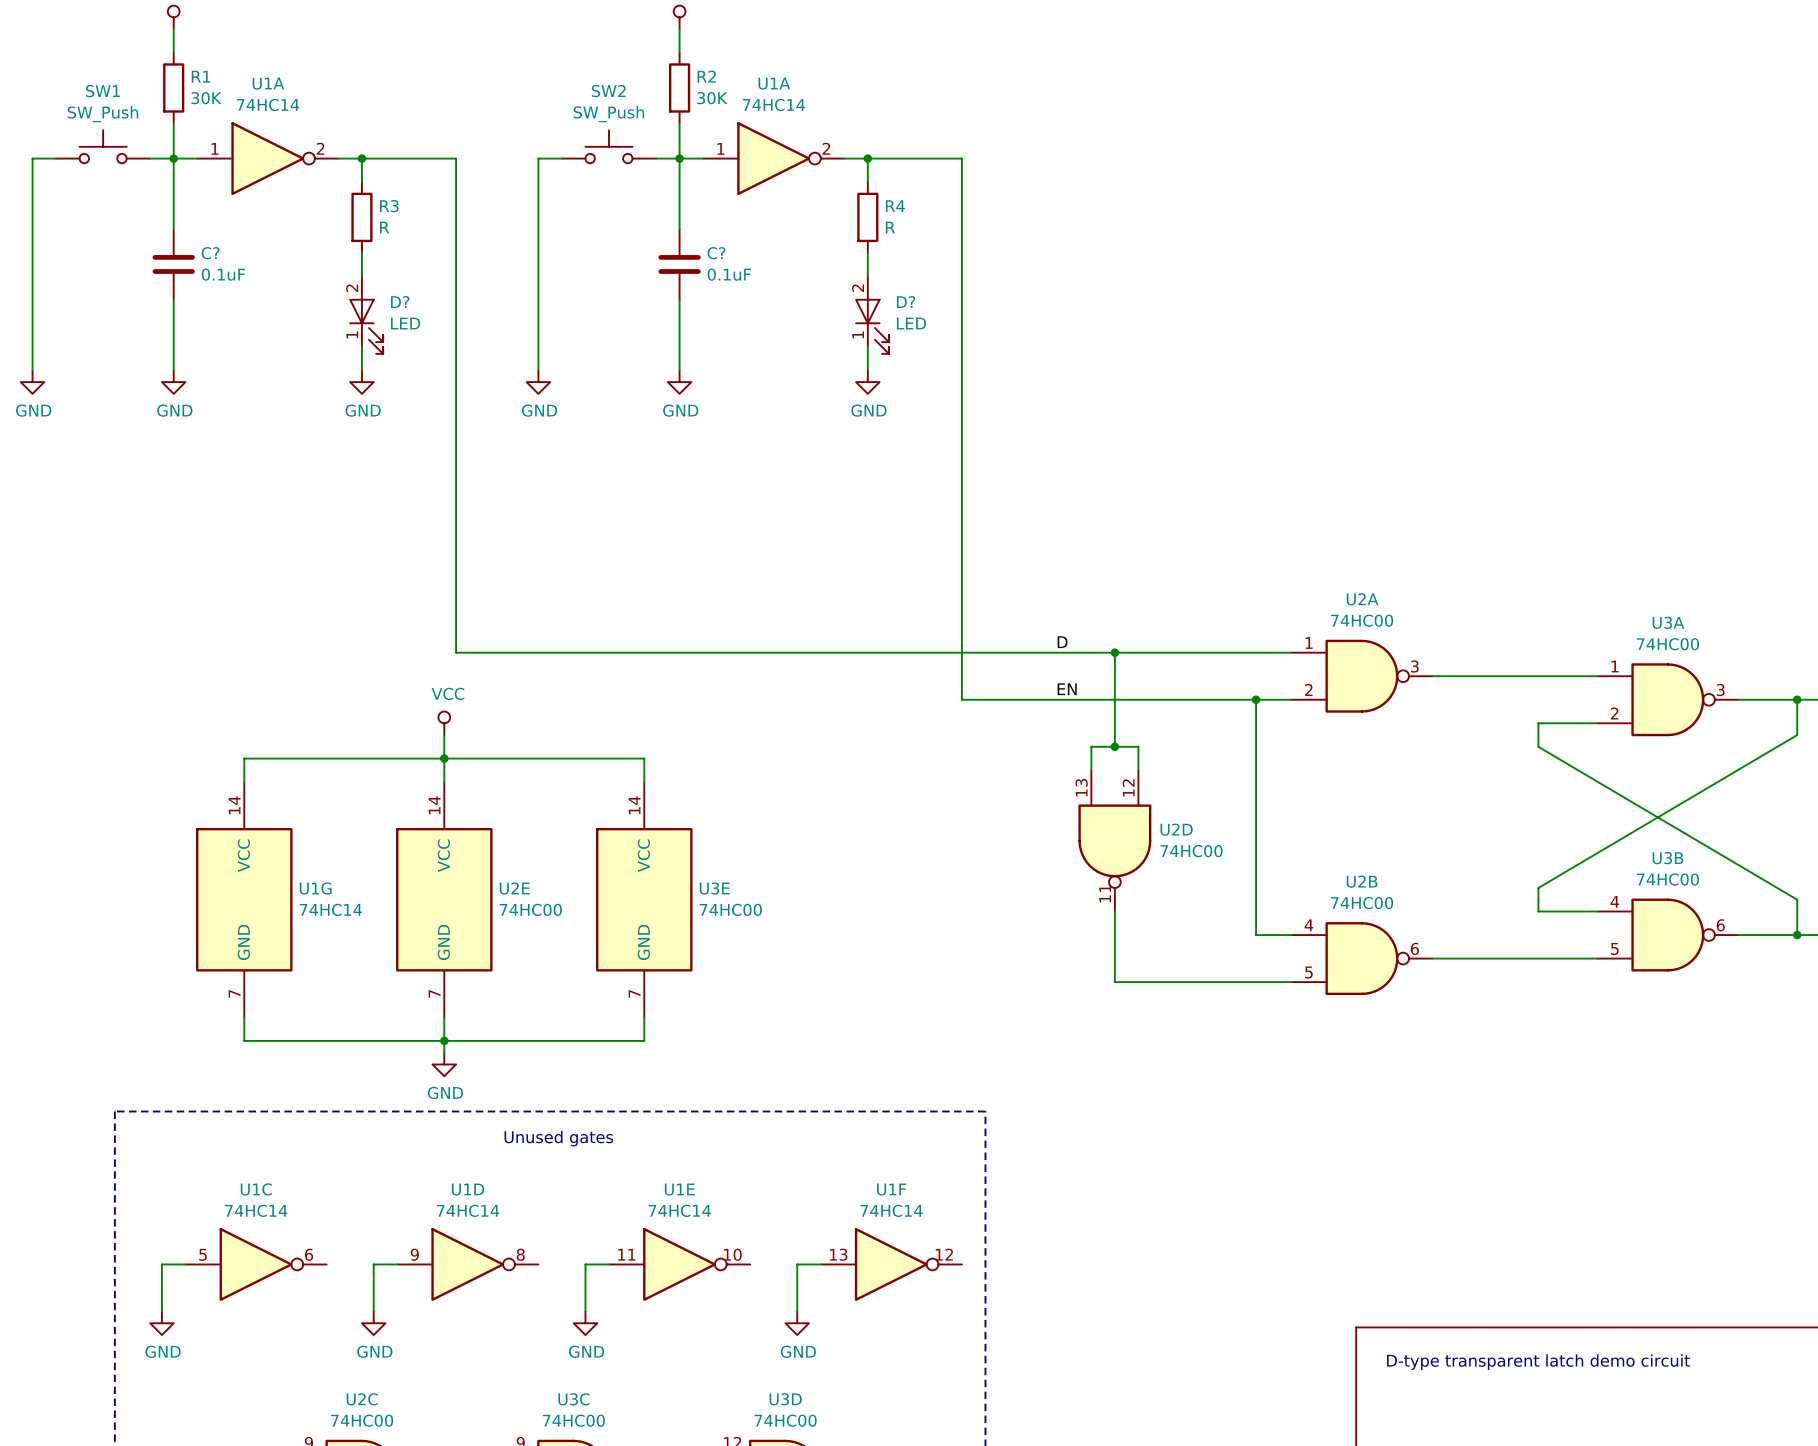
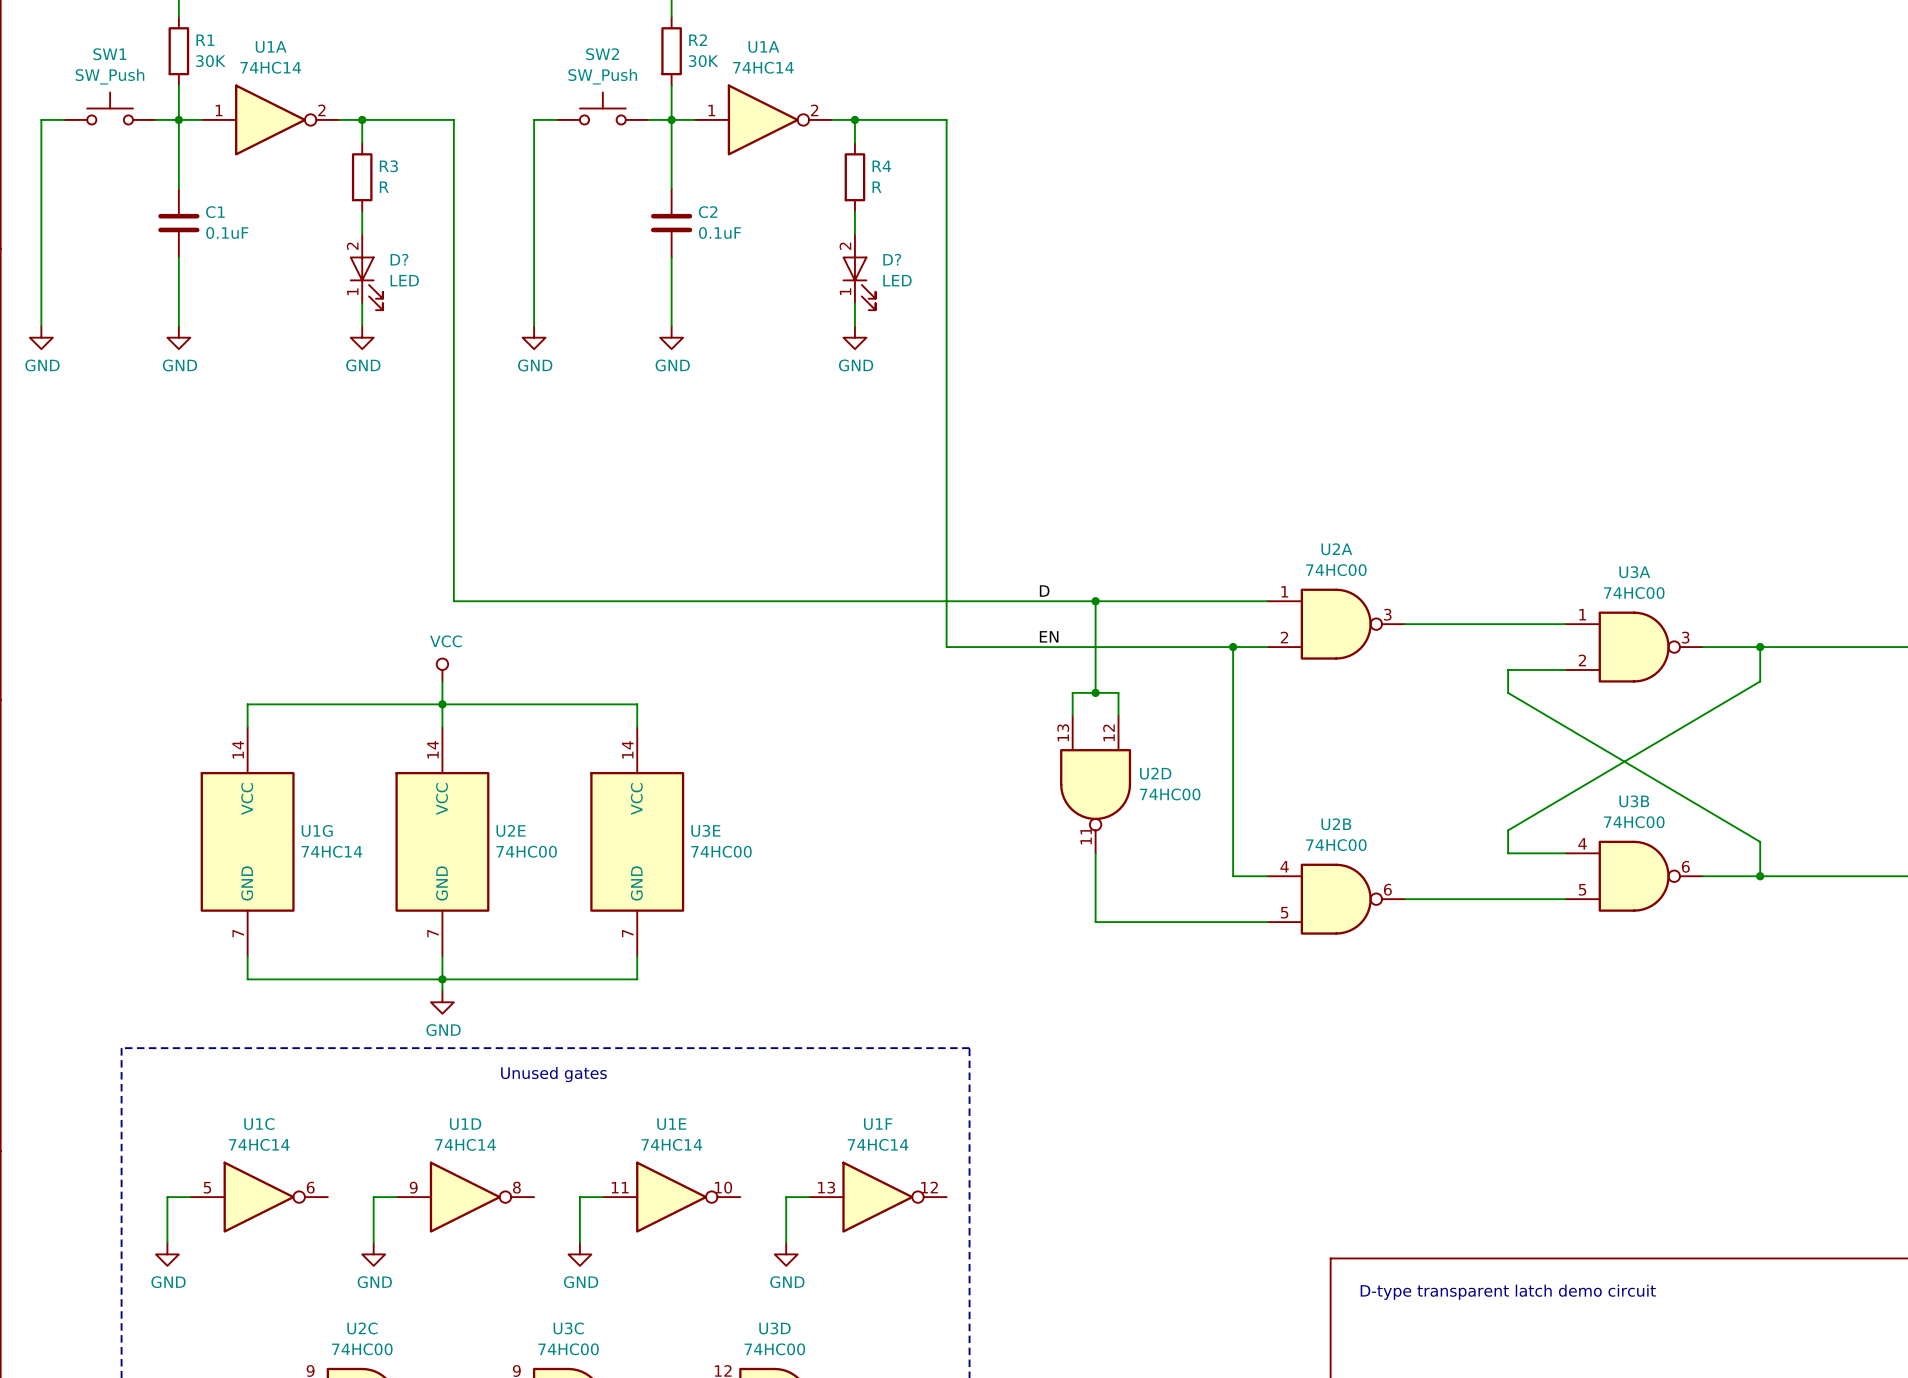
C? name: C? (210, 253) -> C1 (215, 212)
C? name: C? (716, 253) -> C2 (708, 212)

